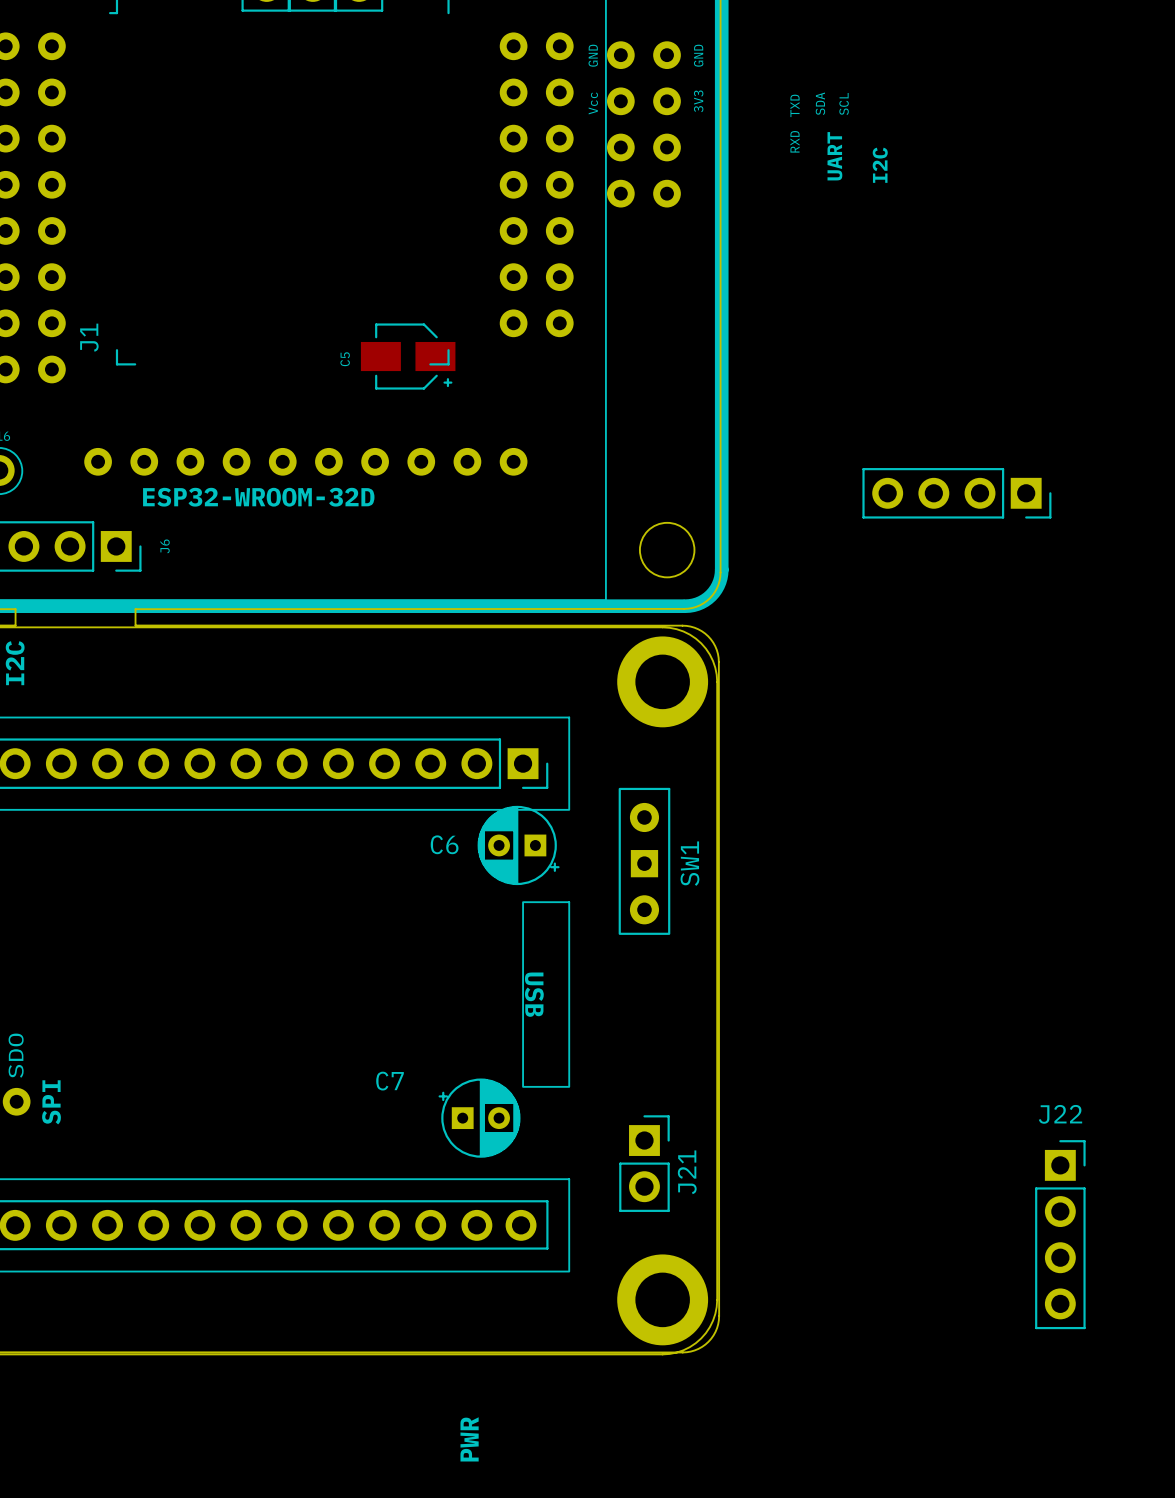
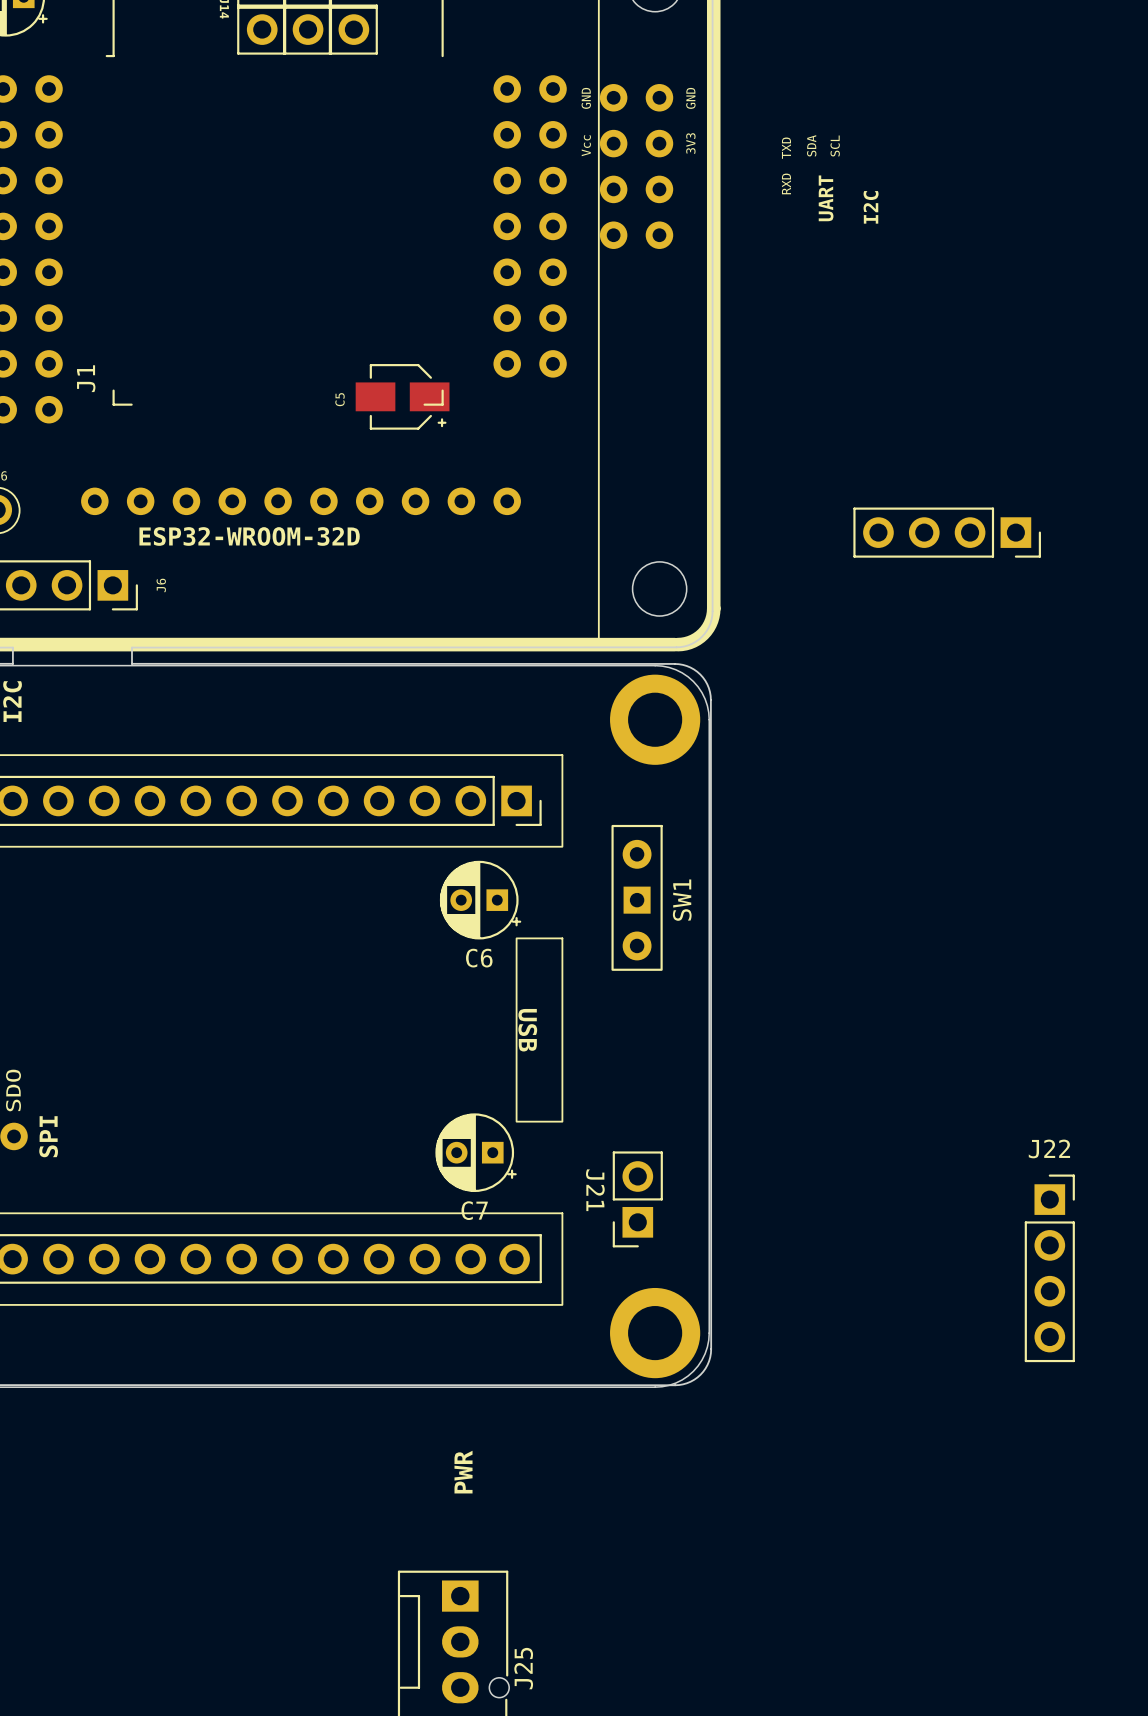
C6 name position: C6 (444, 844) -> C6 (479, 958)
C6 position: (518, 845) -> (480, 900)
C7 name position: C7 (390, 1081) -> C7 (474, 1210)
C7 rotation: 0° (479, 1118) -> 180° (476, 1152)
J21 rotation: 0° (644, 1163) -> 180° (637, 1199)

